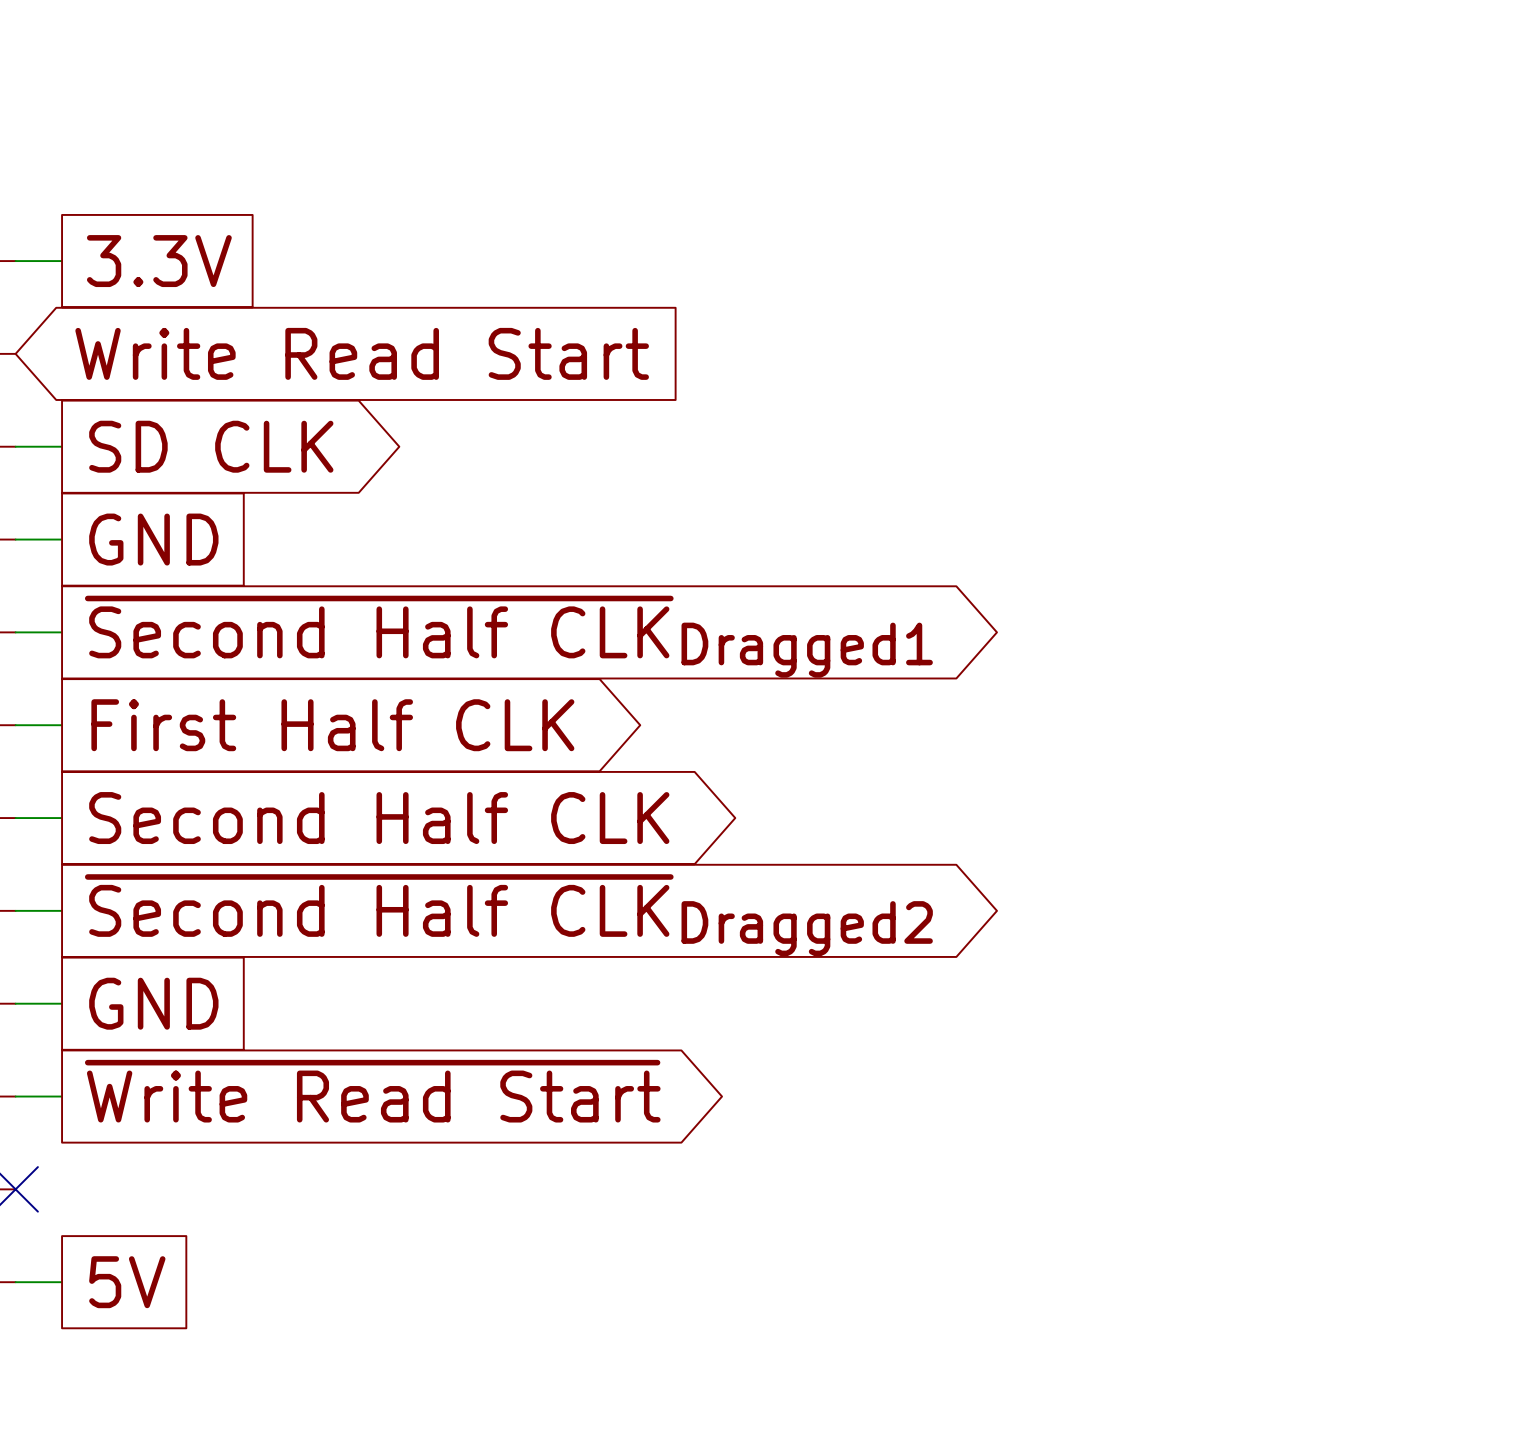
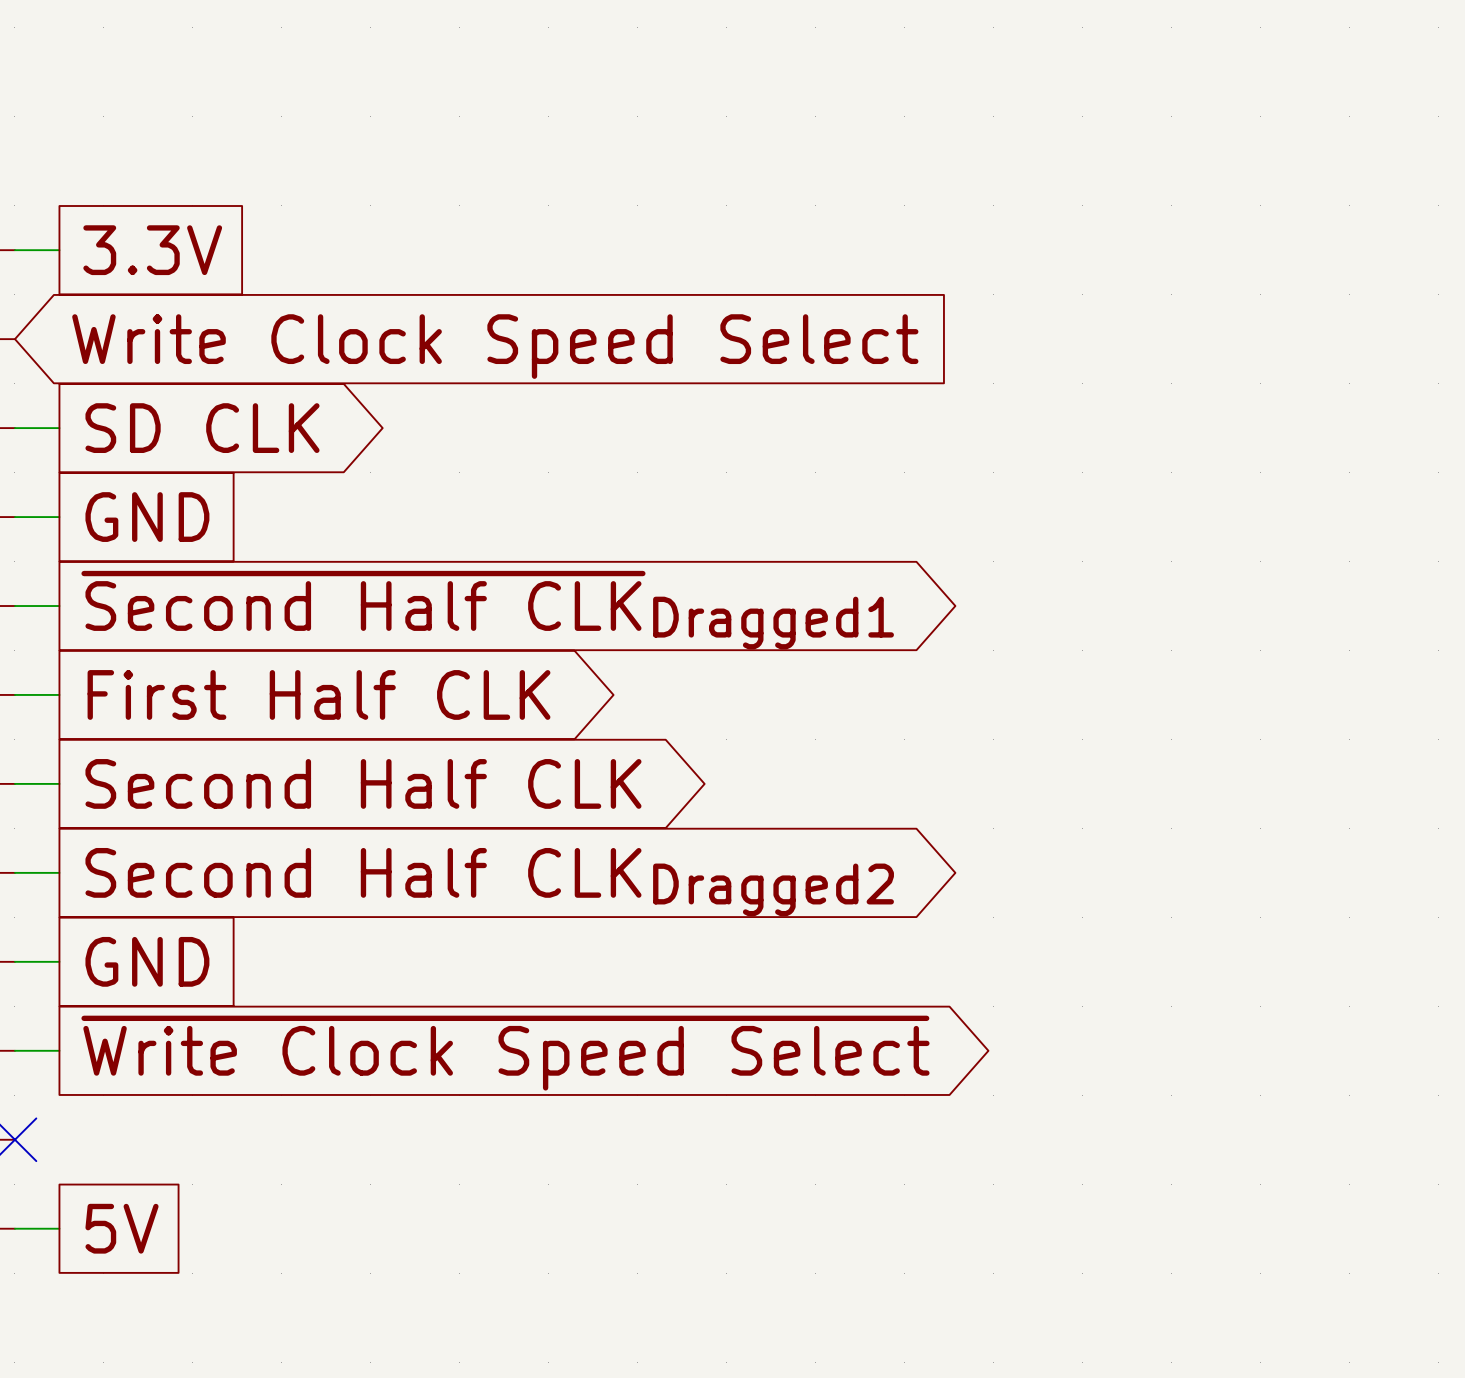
global label: Write Read Start (362, 353) -> Write Clock Speed Select (495, 346)
global label: ~{Second Half CLK}Dragged2 (508, 915) -> Second Half CLKDragged2 (489, 882)
global label: ~{Write Read Start} (372, 1091) -> ~{Write Clock Speed Select} (505, 1053)

